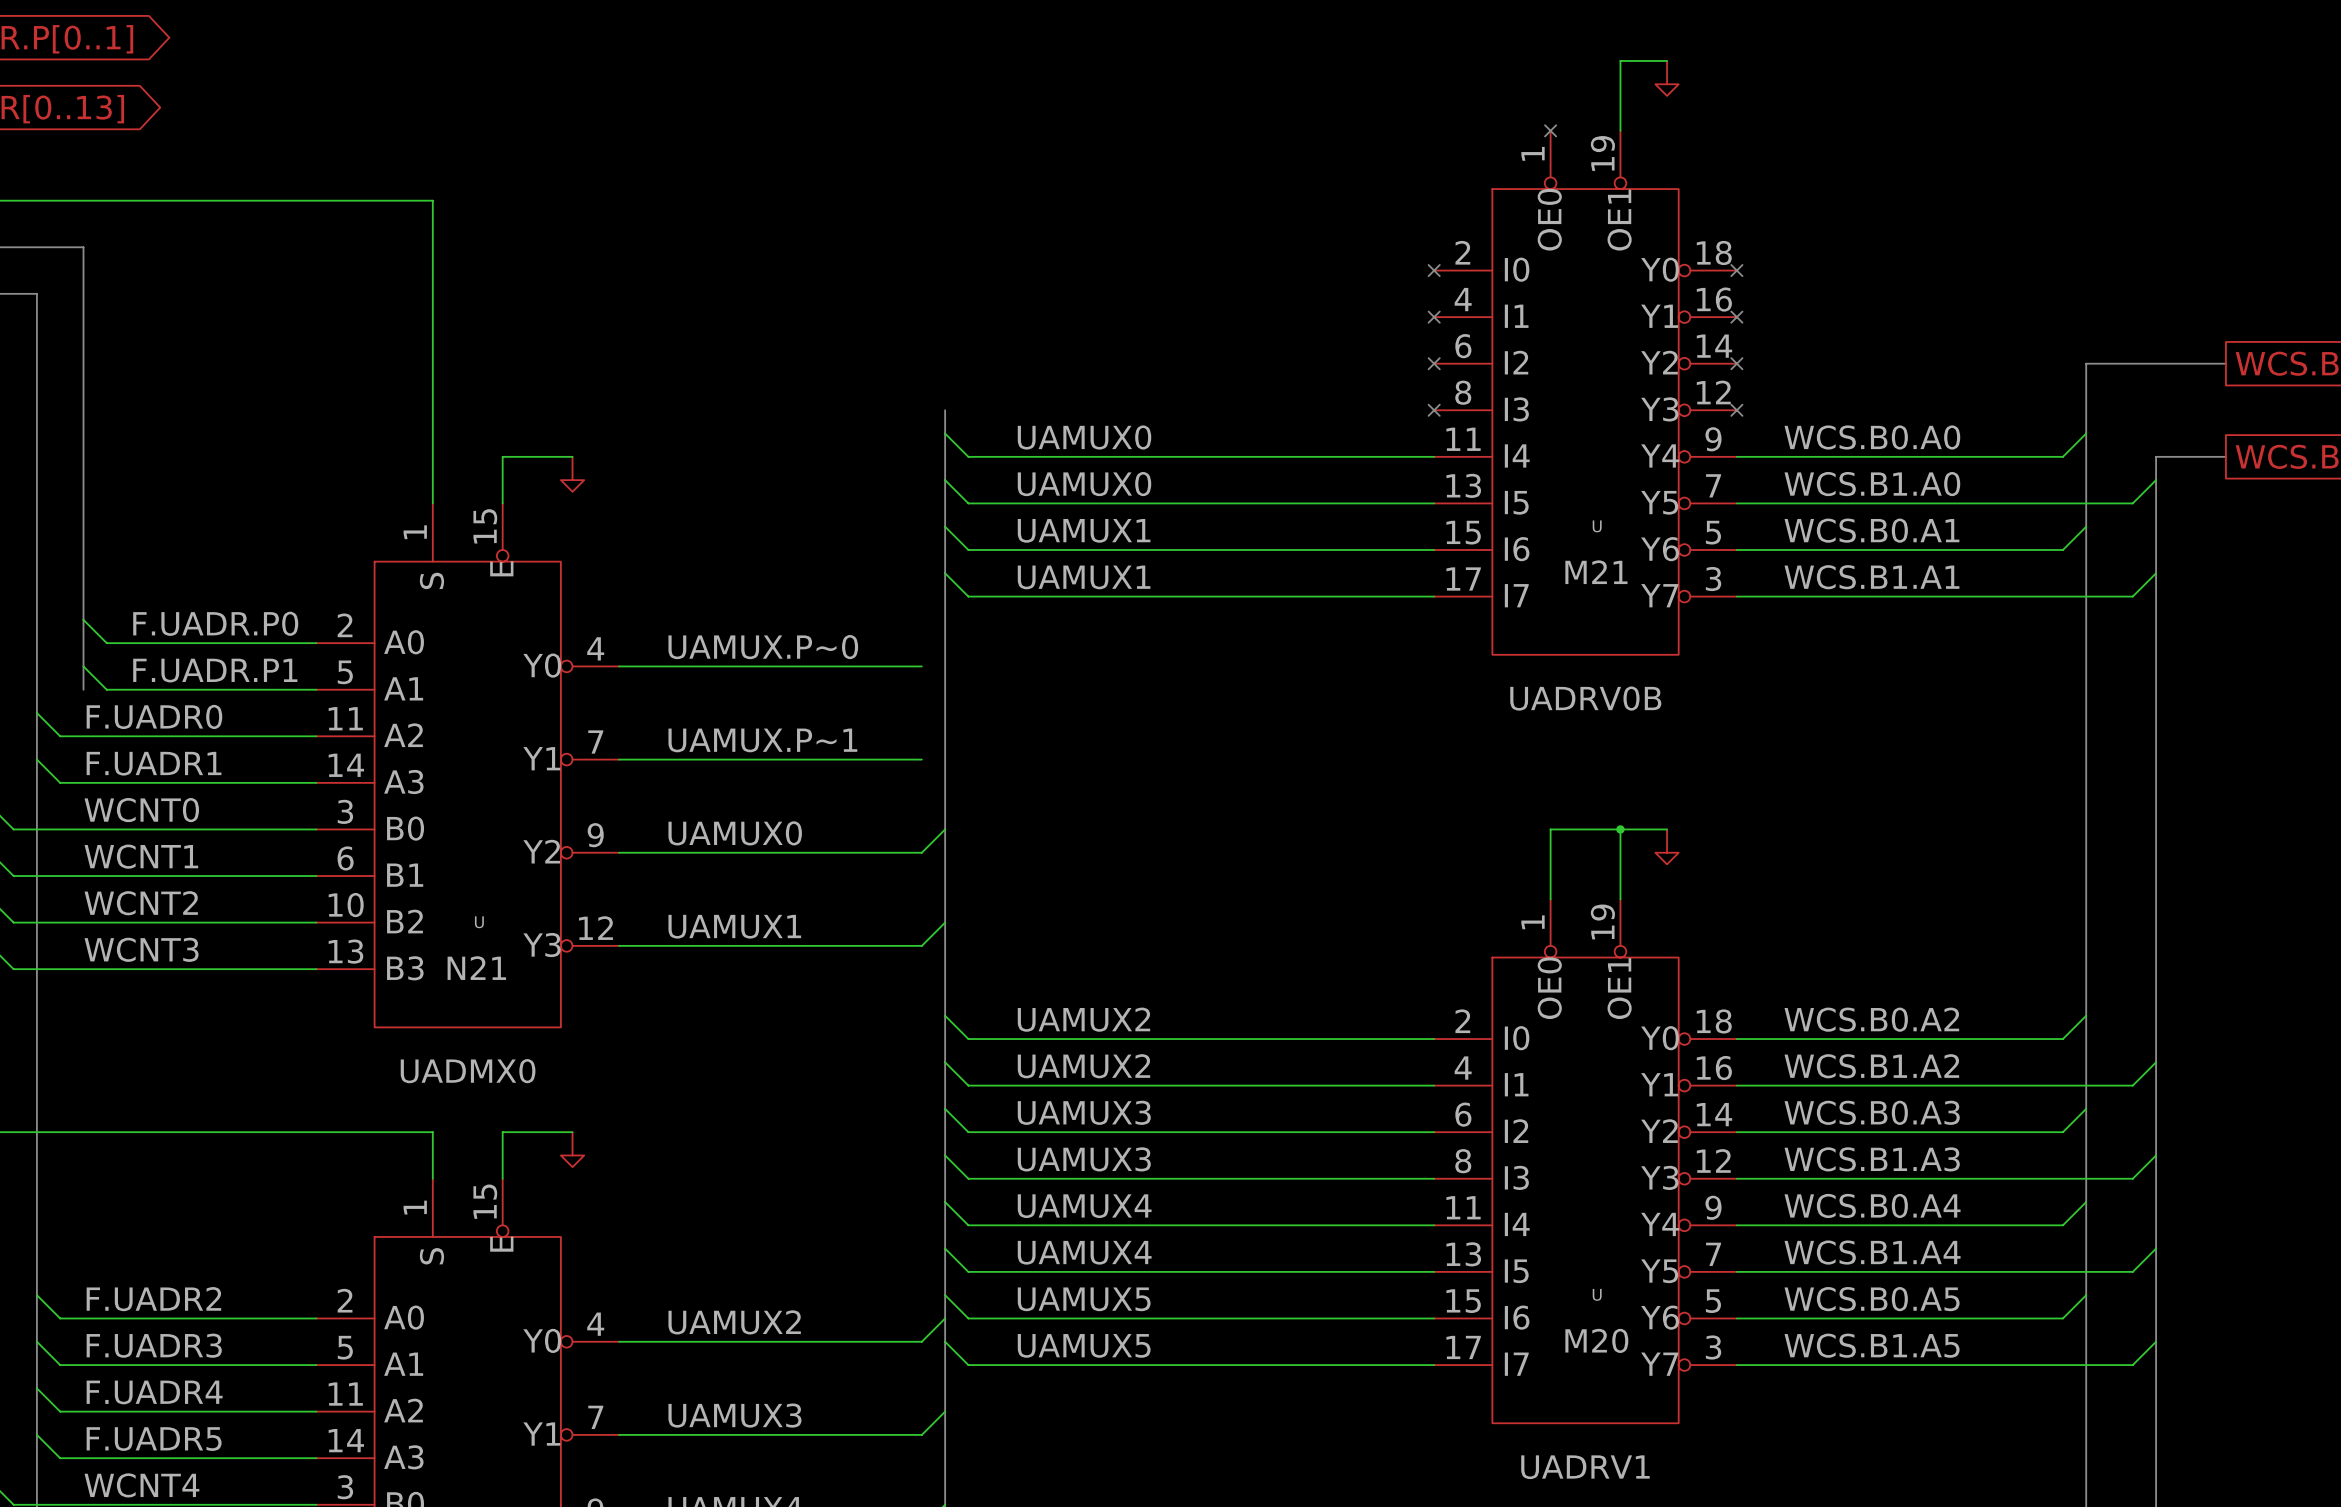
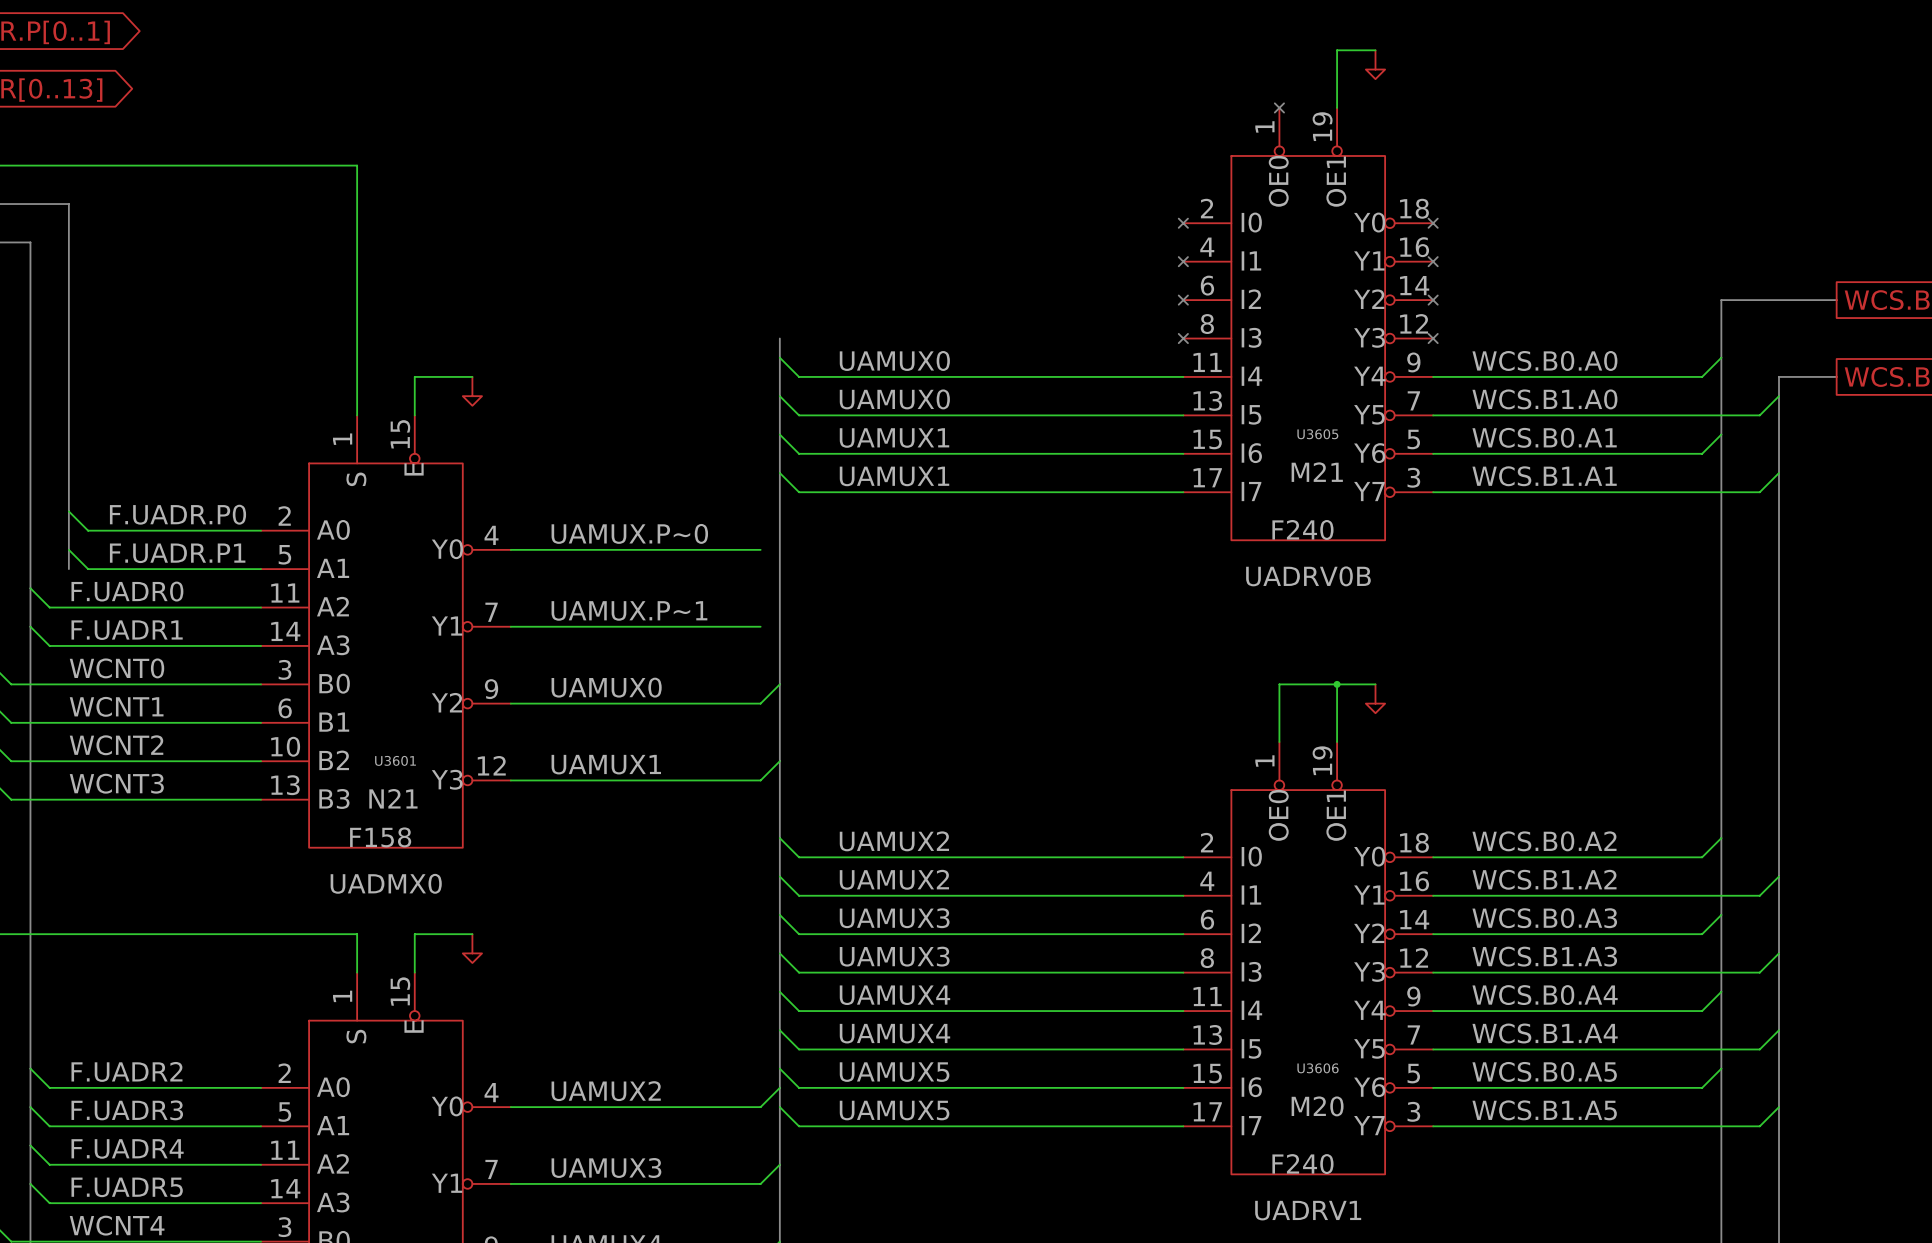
U name: U (1597, 526) -> U3605 (1317, 434)
U value: none -> F240 (1302, 529)
U name: U (479, 922) -> U3601 (395, 760)
U value: none -> F158 (380, 837)
U name: U (1597, 1294) -> U3606 (1318, 1068)
U value: none -> F240 (1302, 1164)

